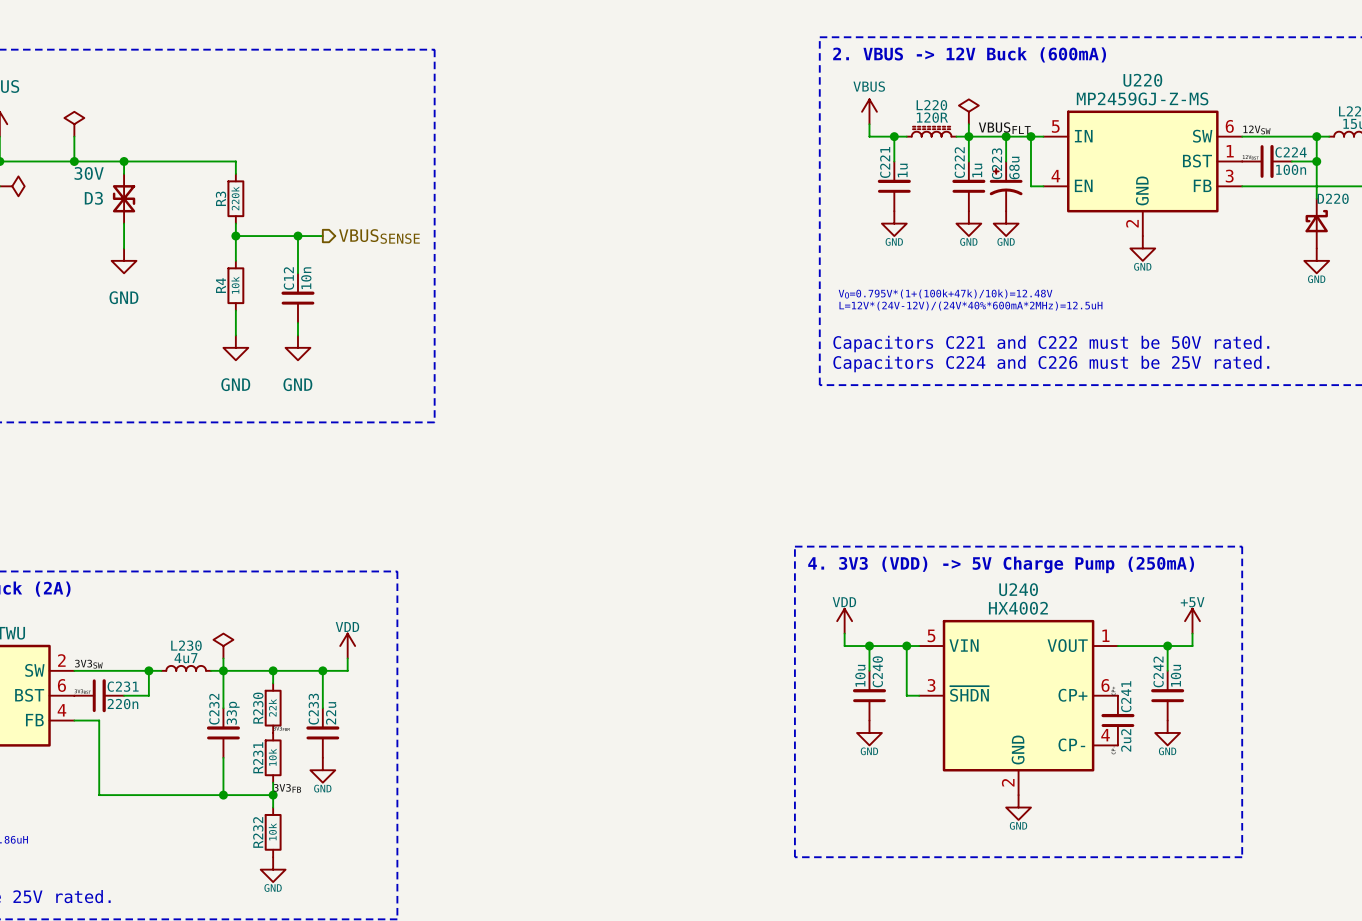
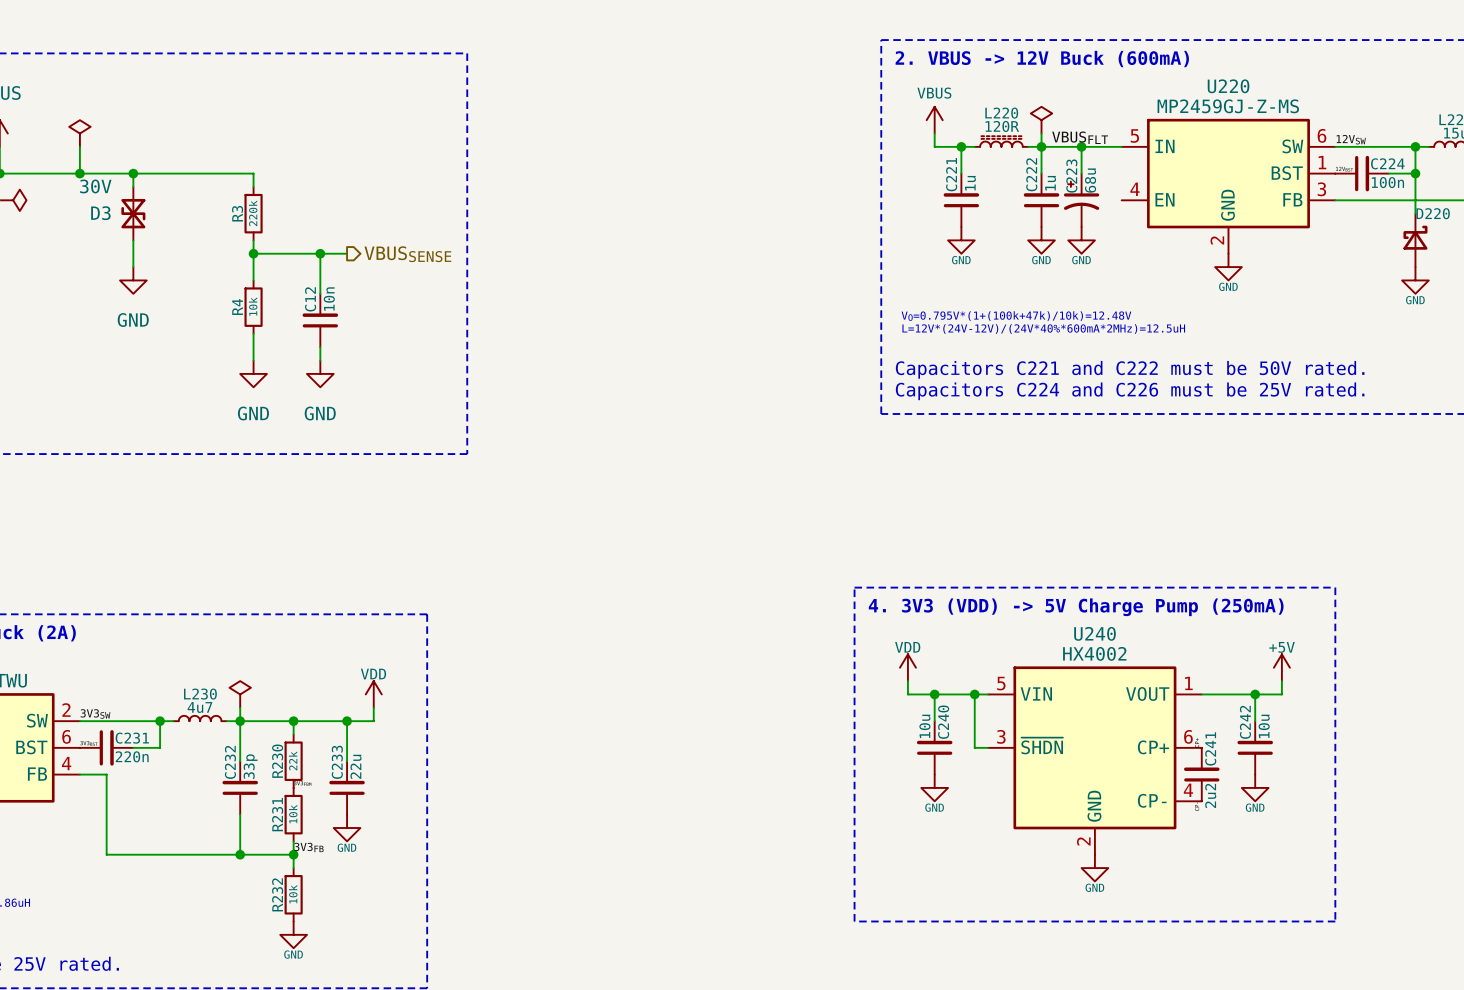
wire: (1030, 136) (1030, 186) (1043, 186) -> none
junction: (1030, 136) -> none

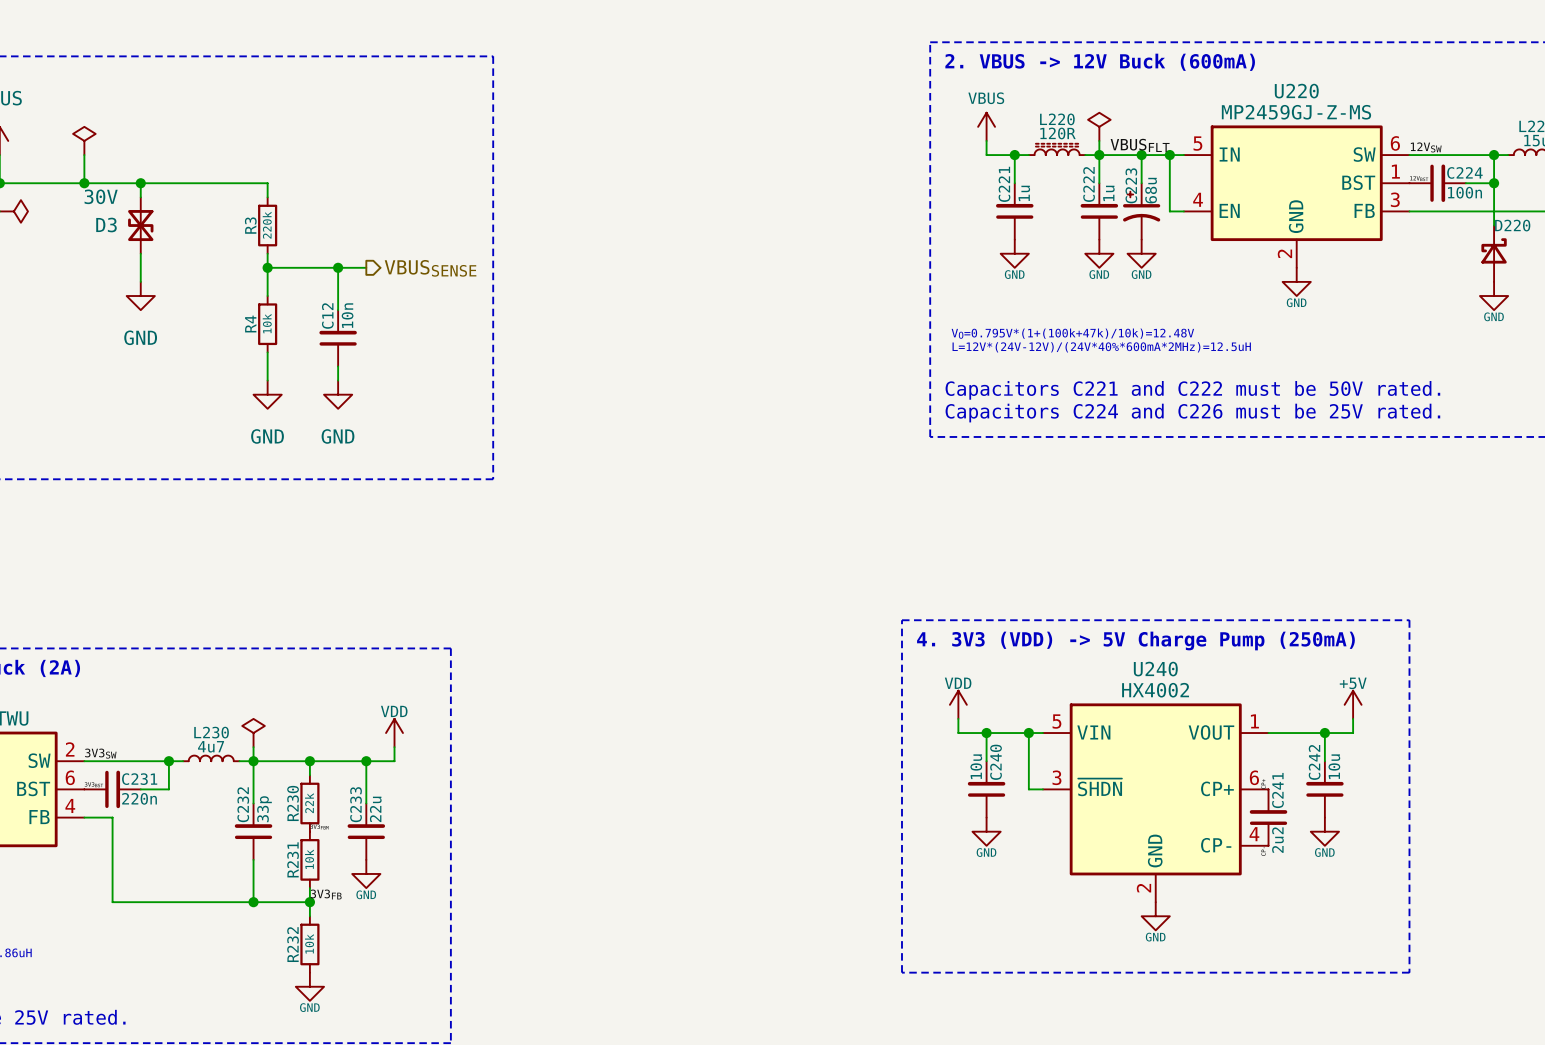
wire: none -> (1169, 155) (1169, 211) (1183, 211)
junction: none -> (1169, 155)

